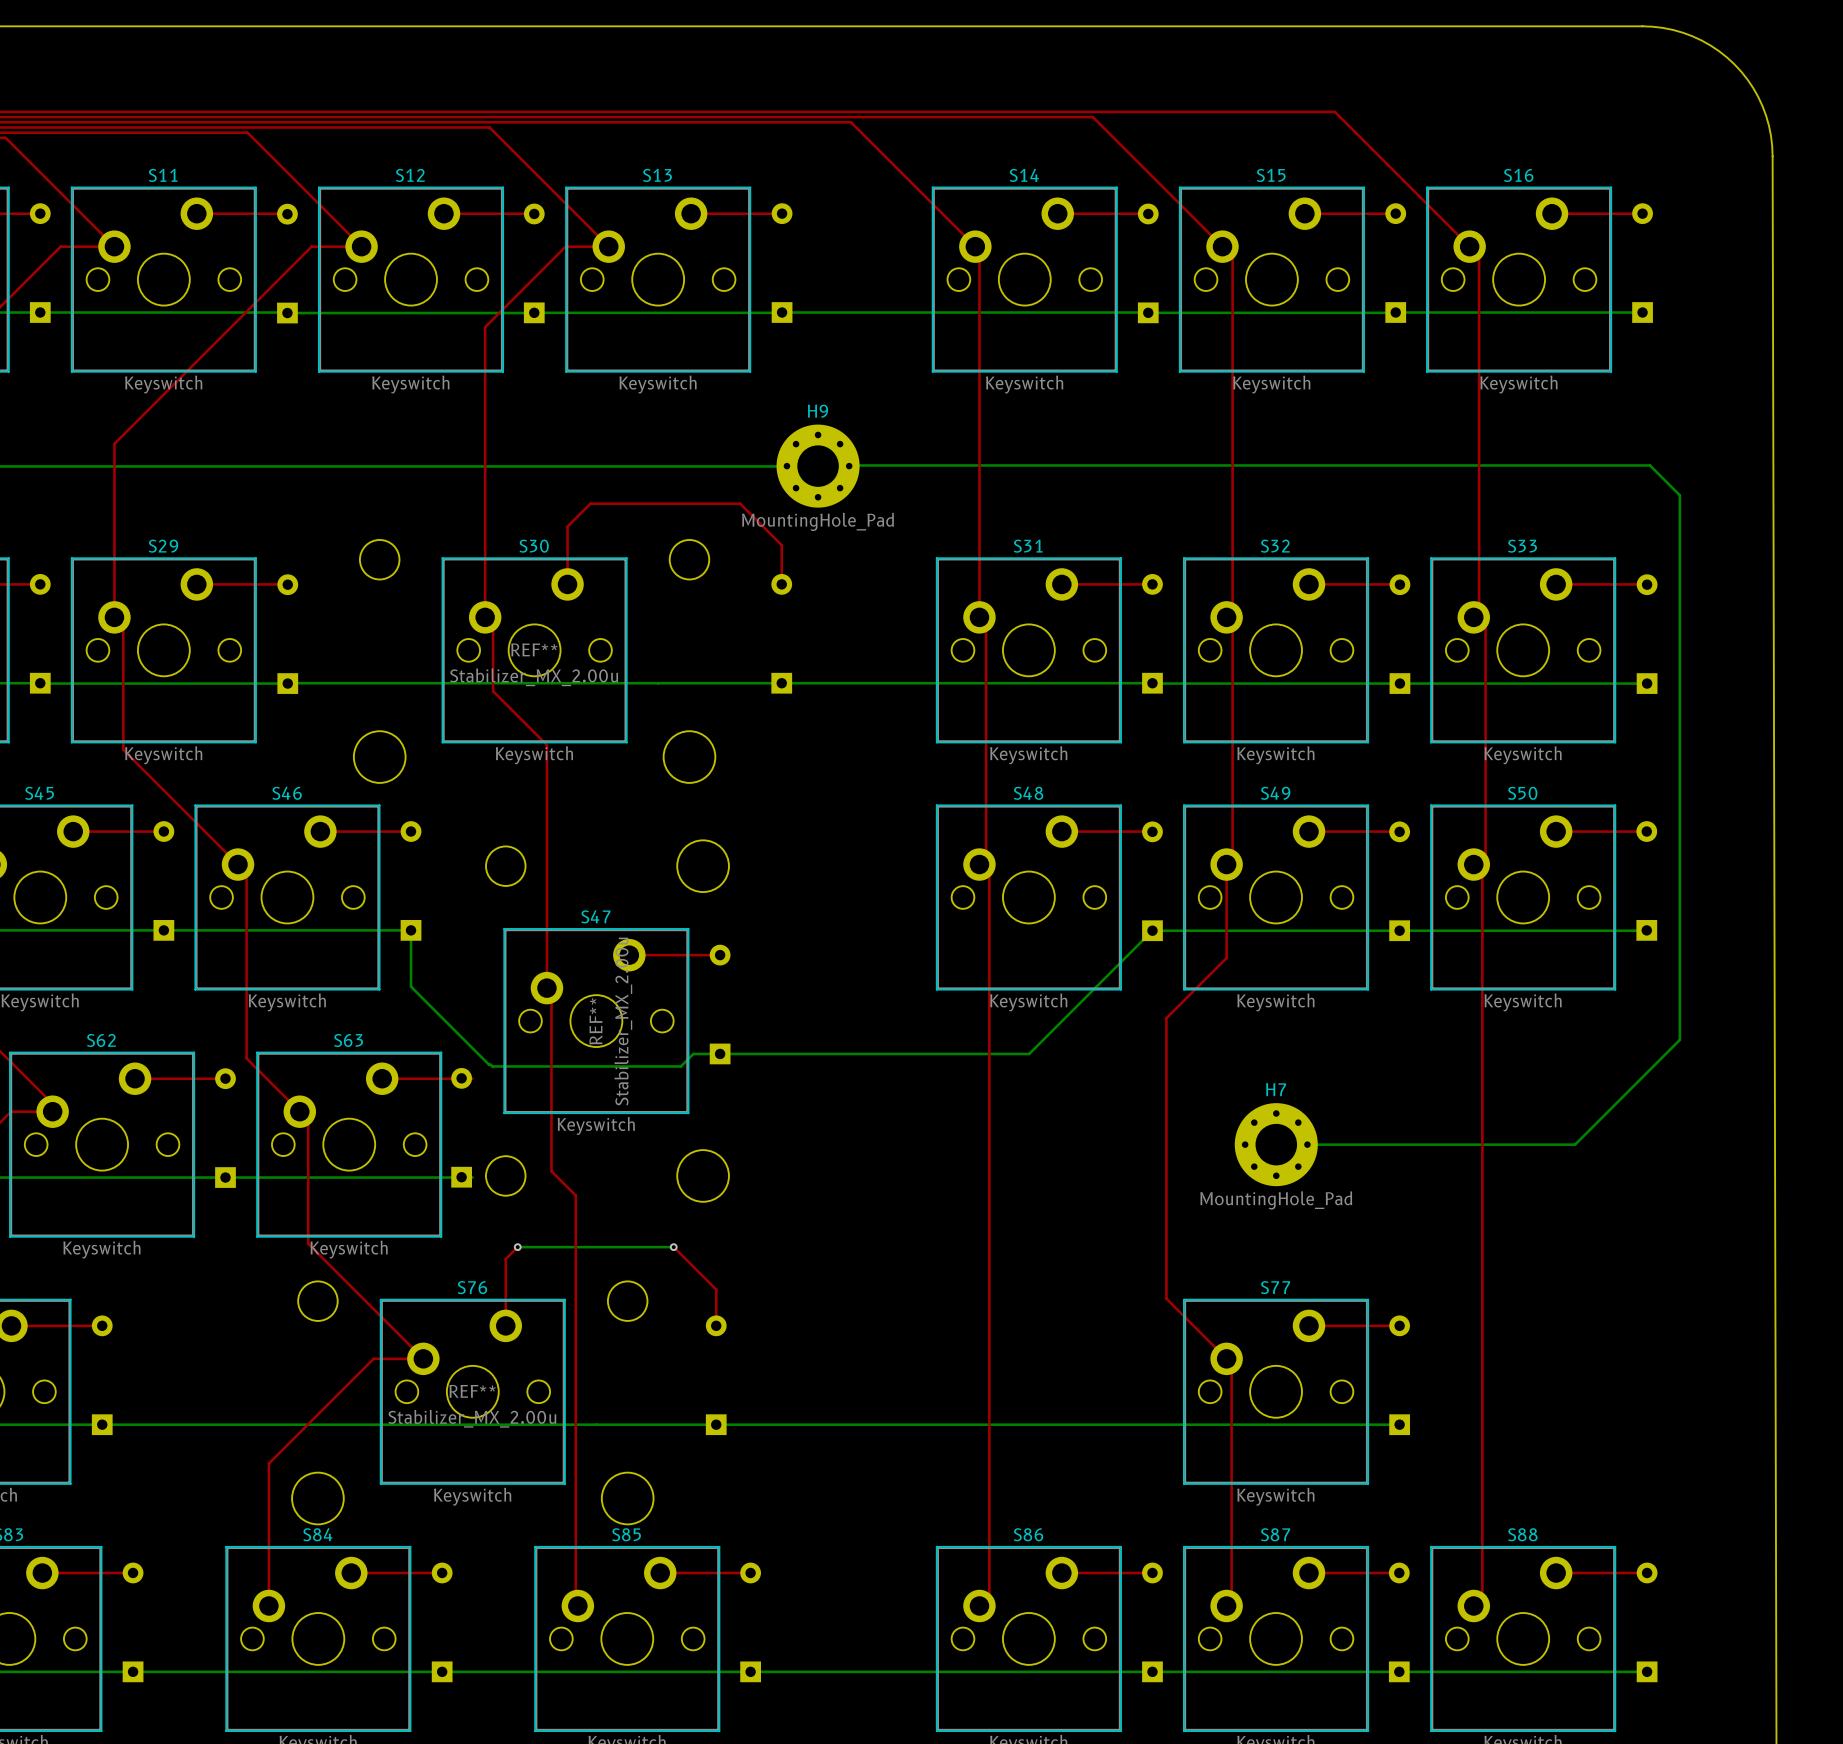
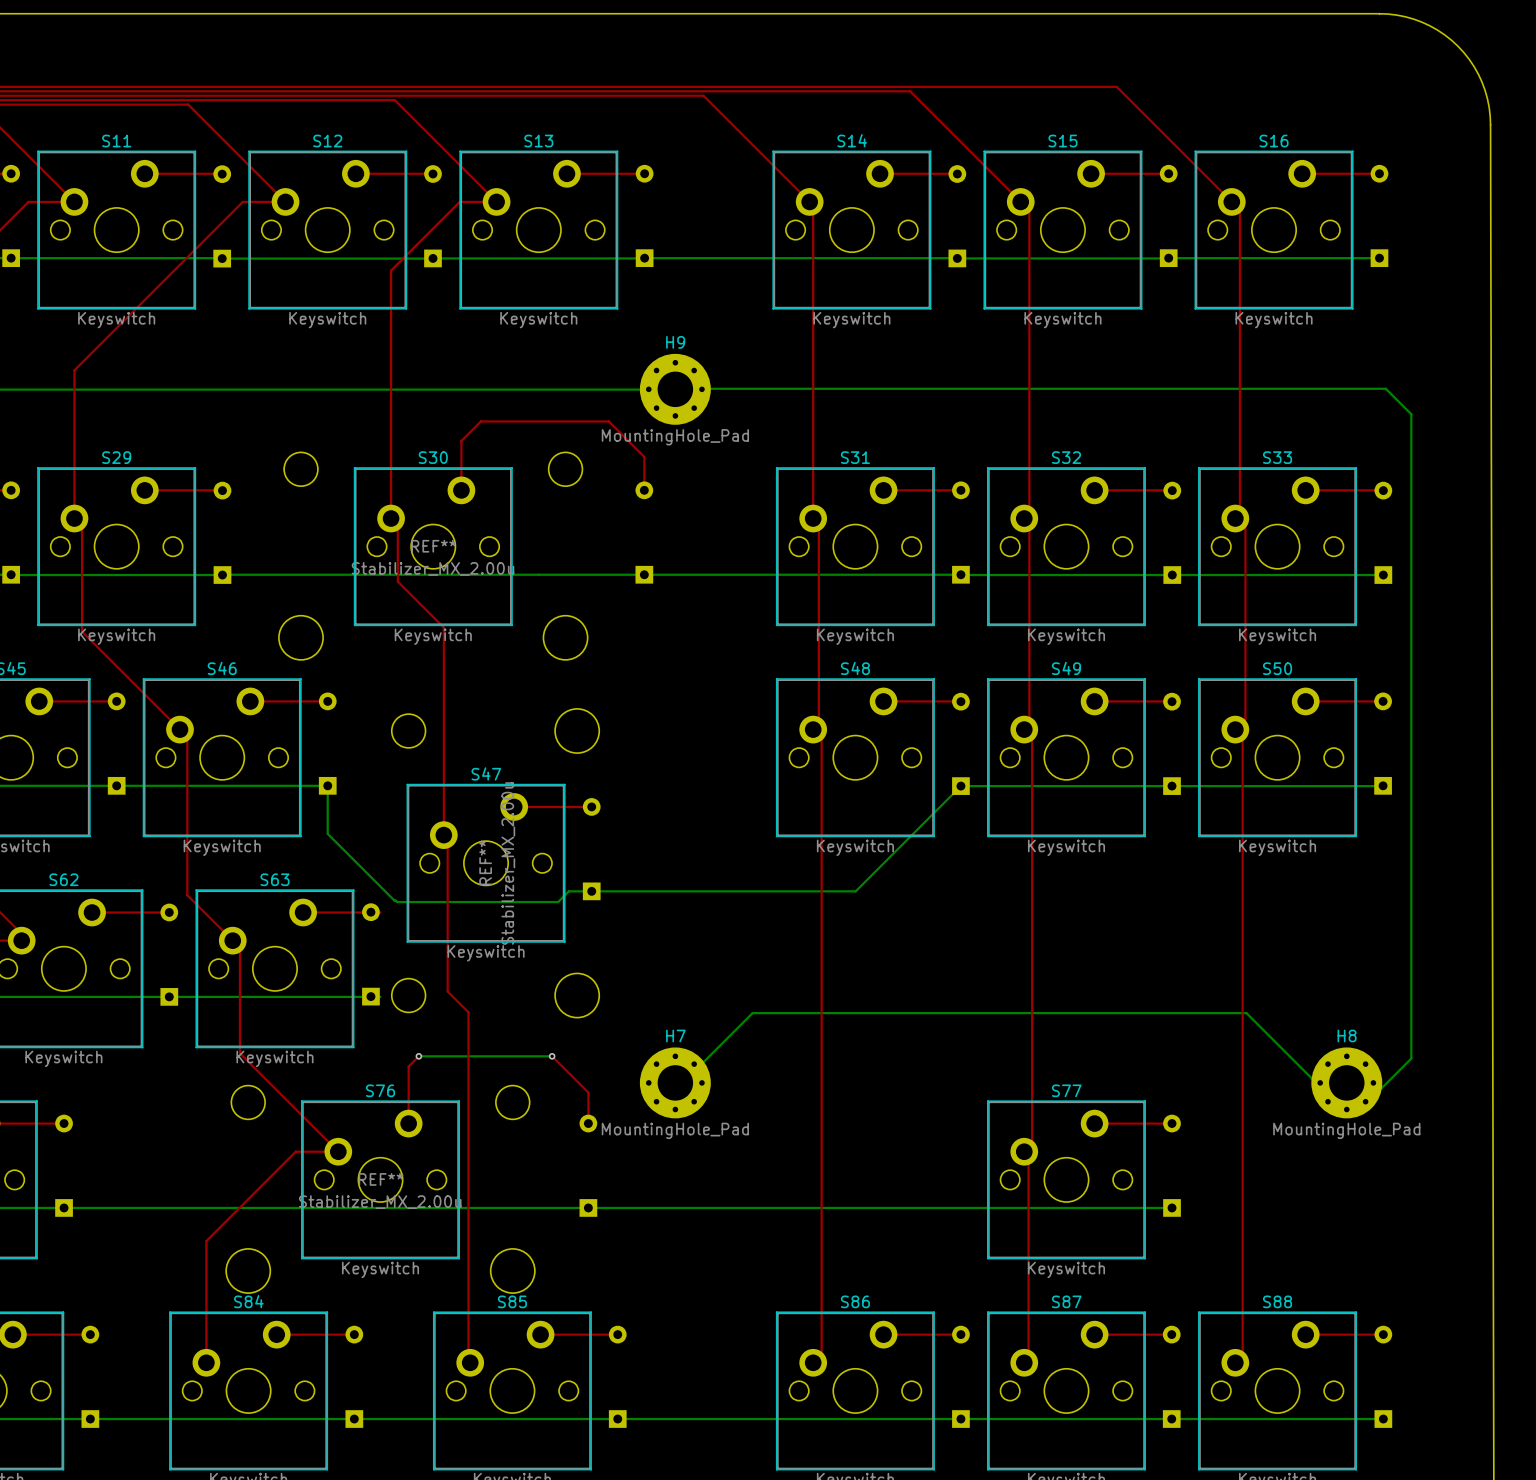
top track: (1226, 864) (1226, 957) (1166, 1018) (1166, 1298) (1226, 1358) -> (1024, 729) (1032, 737) (1032, 1143) (1024, 1151)
bottom track: (1679, 1039) (1575, 1144) (1276, 1144) -> (1411, 879) (1411, 1058) (1381, 1088) (1321, 1088) (1246, 1013) (752, 1013) (680, 1085)
H7 position: (1276, 1144) -> (675, 1082)
H8: none -> MountingHole_Pad (1346, 1082)

